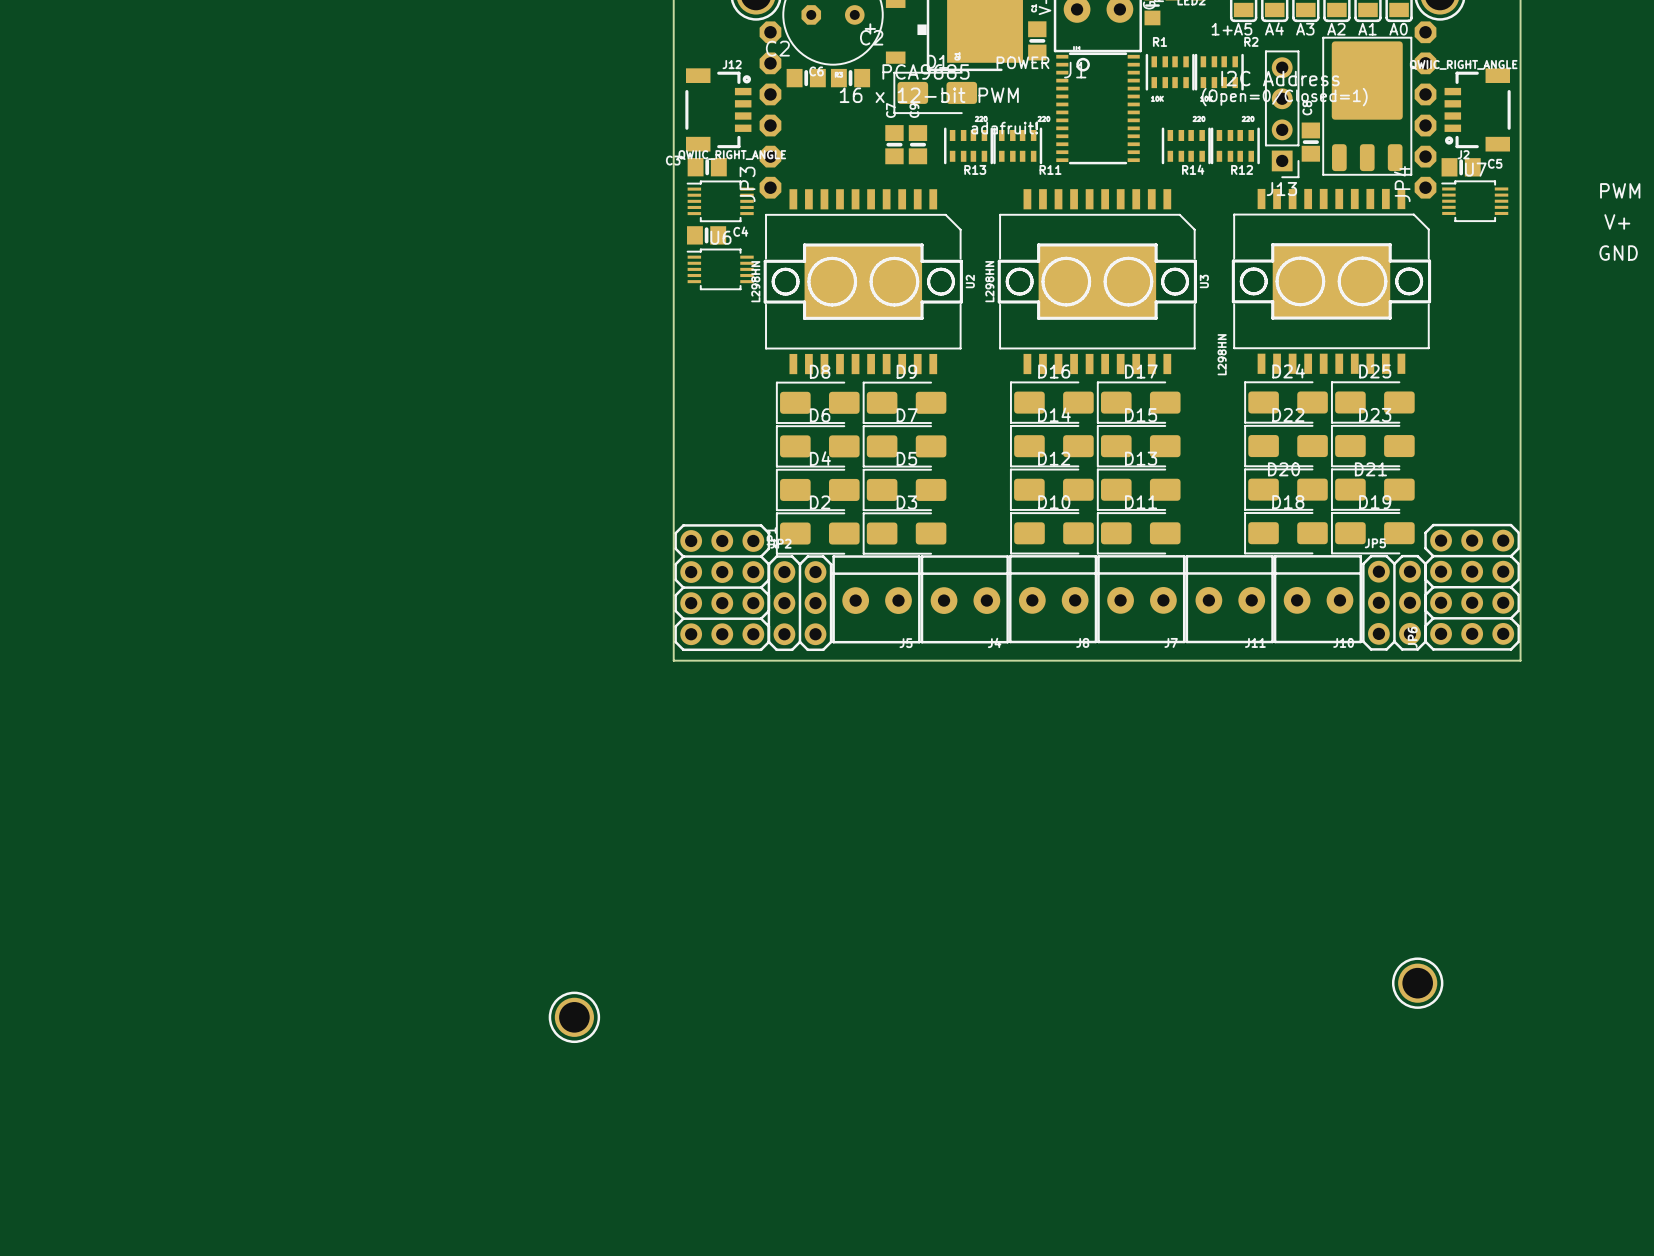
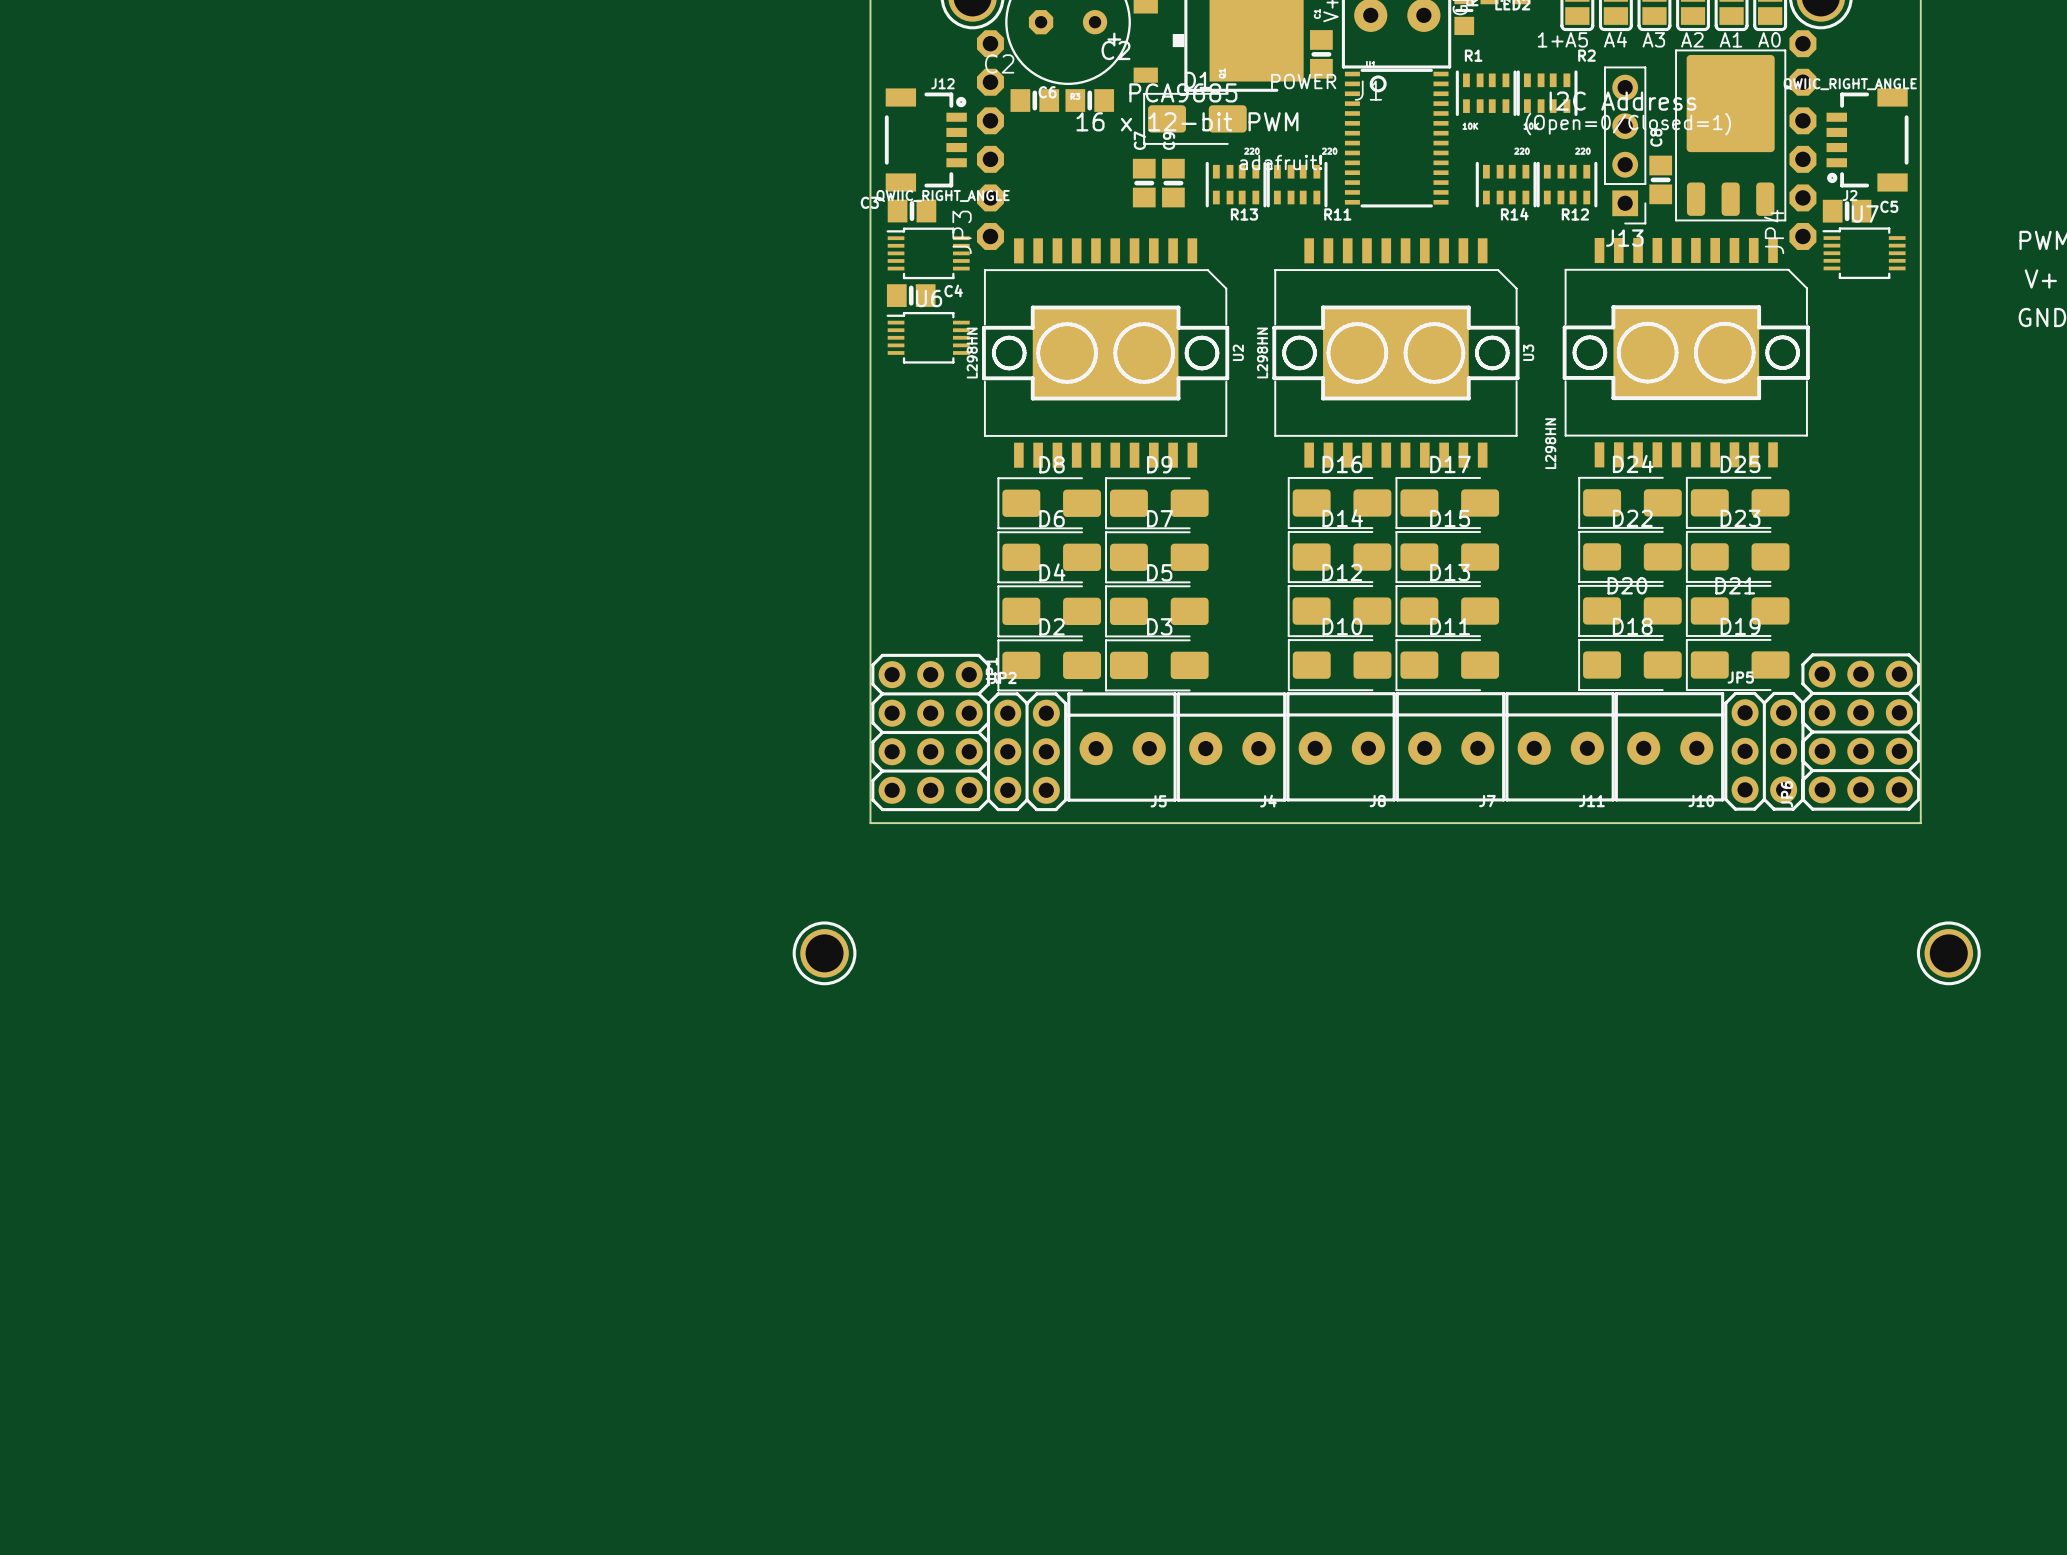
part position: (1417, 983) -> (1948, 953)
part position: (574, 1017) -> (824, 953)

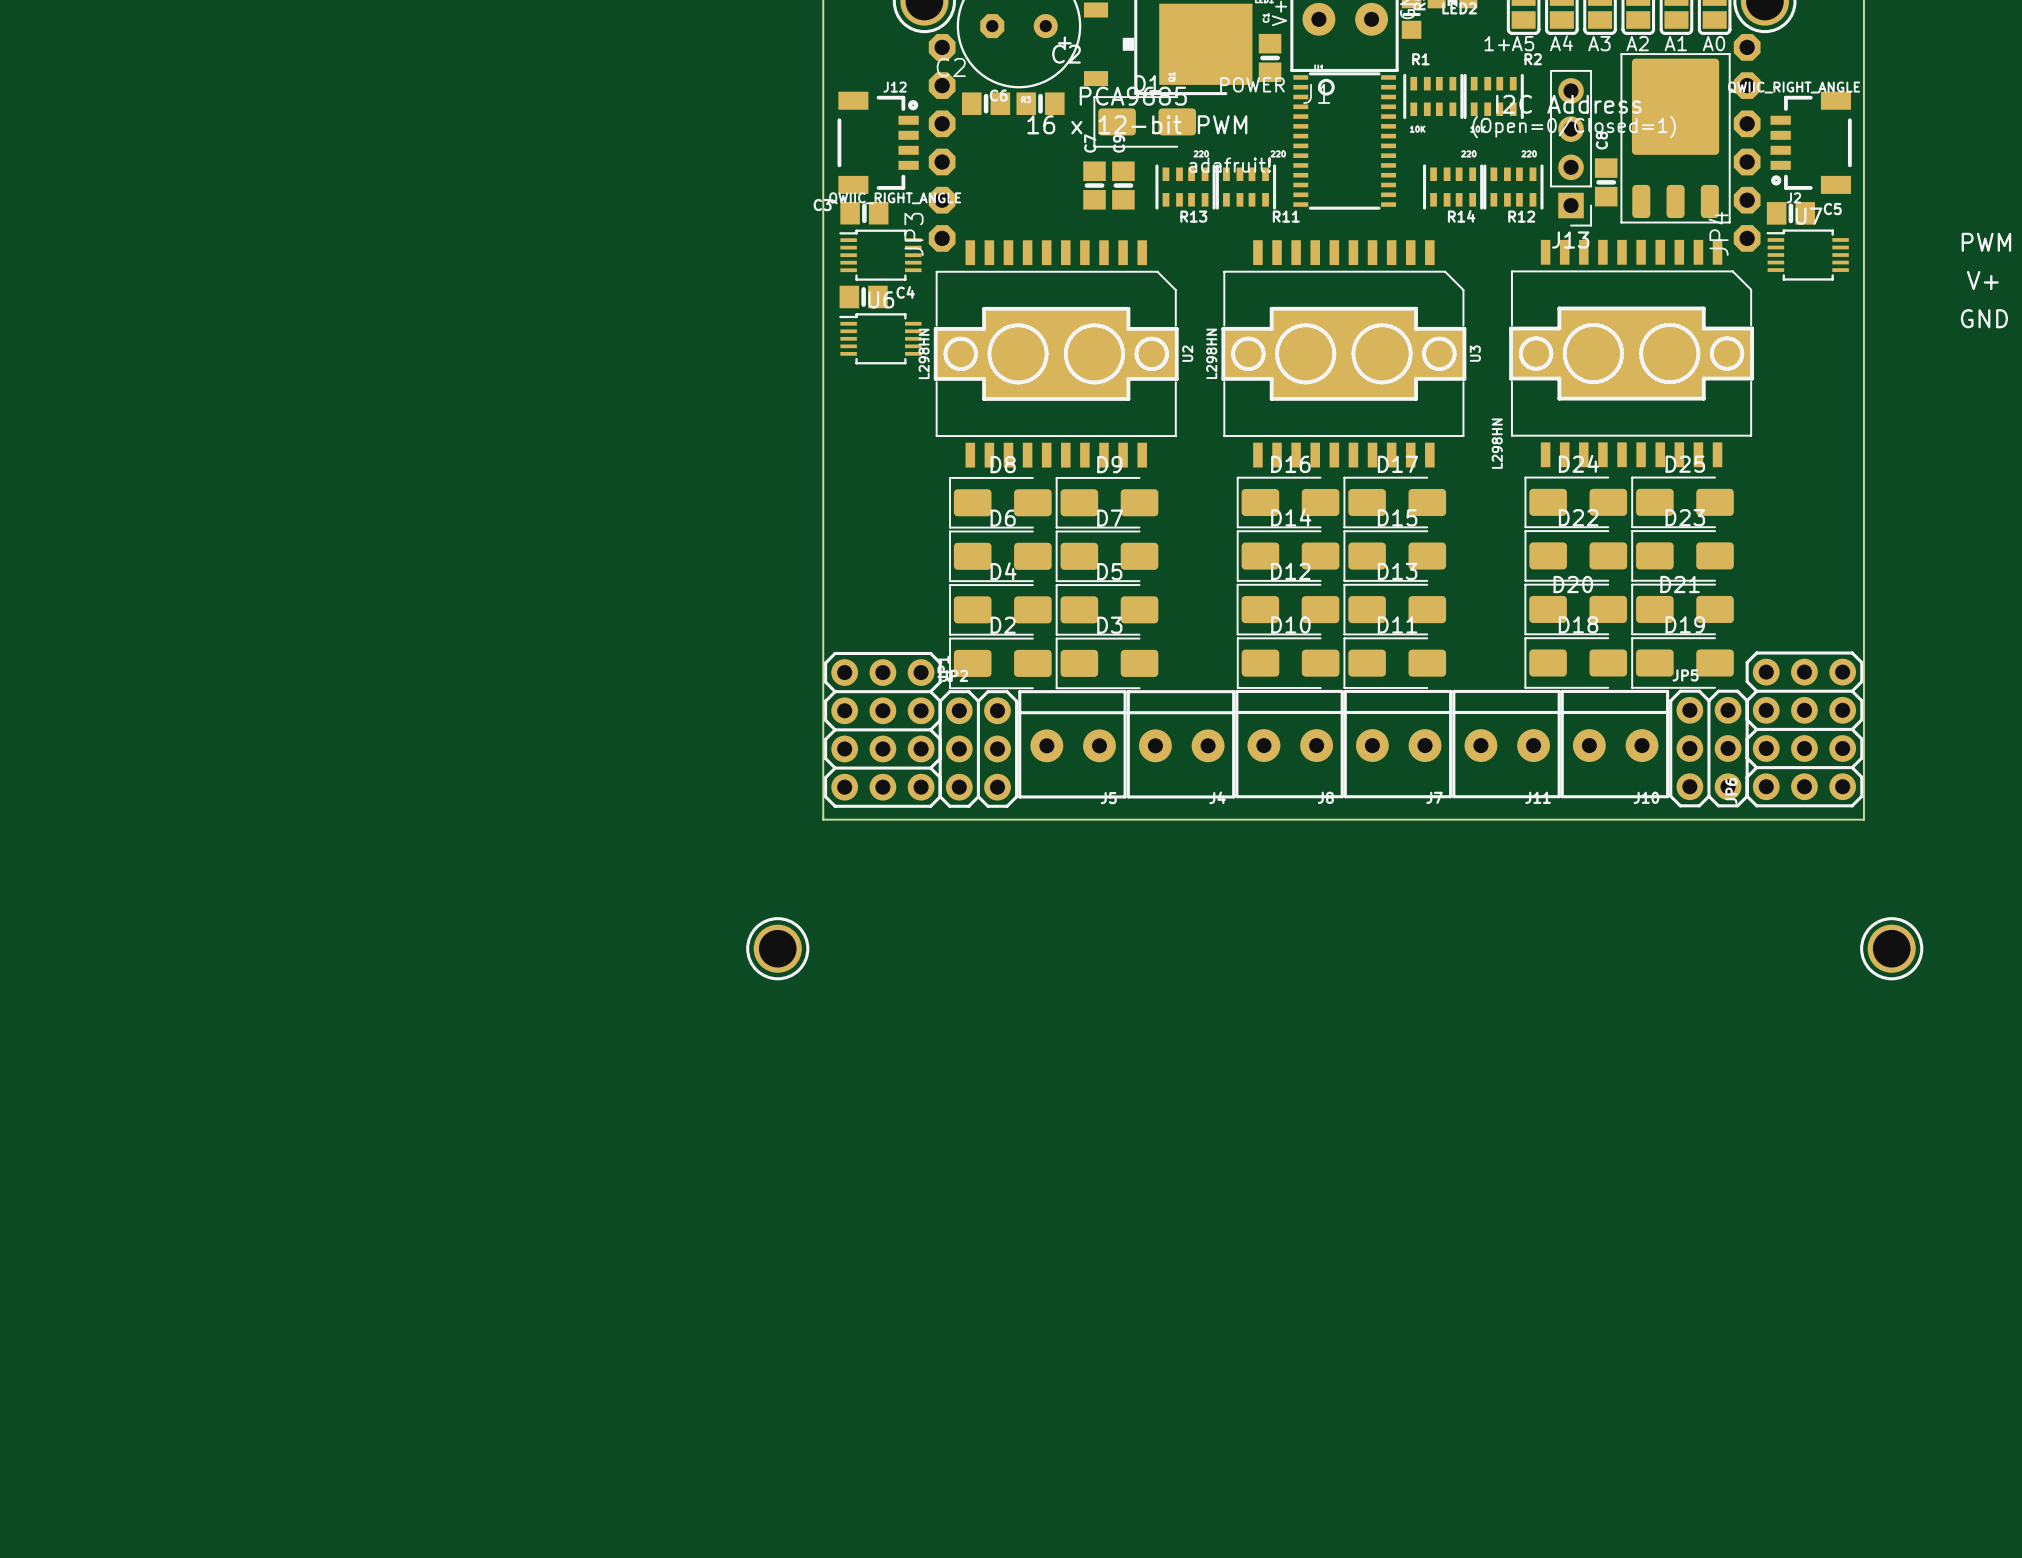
part footprint: [1562, 237, 1810, 468] -> [1509, 239, 1755, 468]
U2 footprint: [982, 238, 1230, 468] -> [933, 240, 1179, 468]
U3 footprint: [1272, 238, 1520, 468] -> [1221, 240, 1467, 468]

